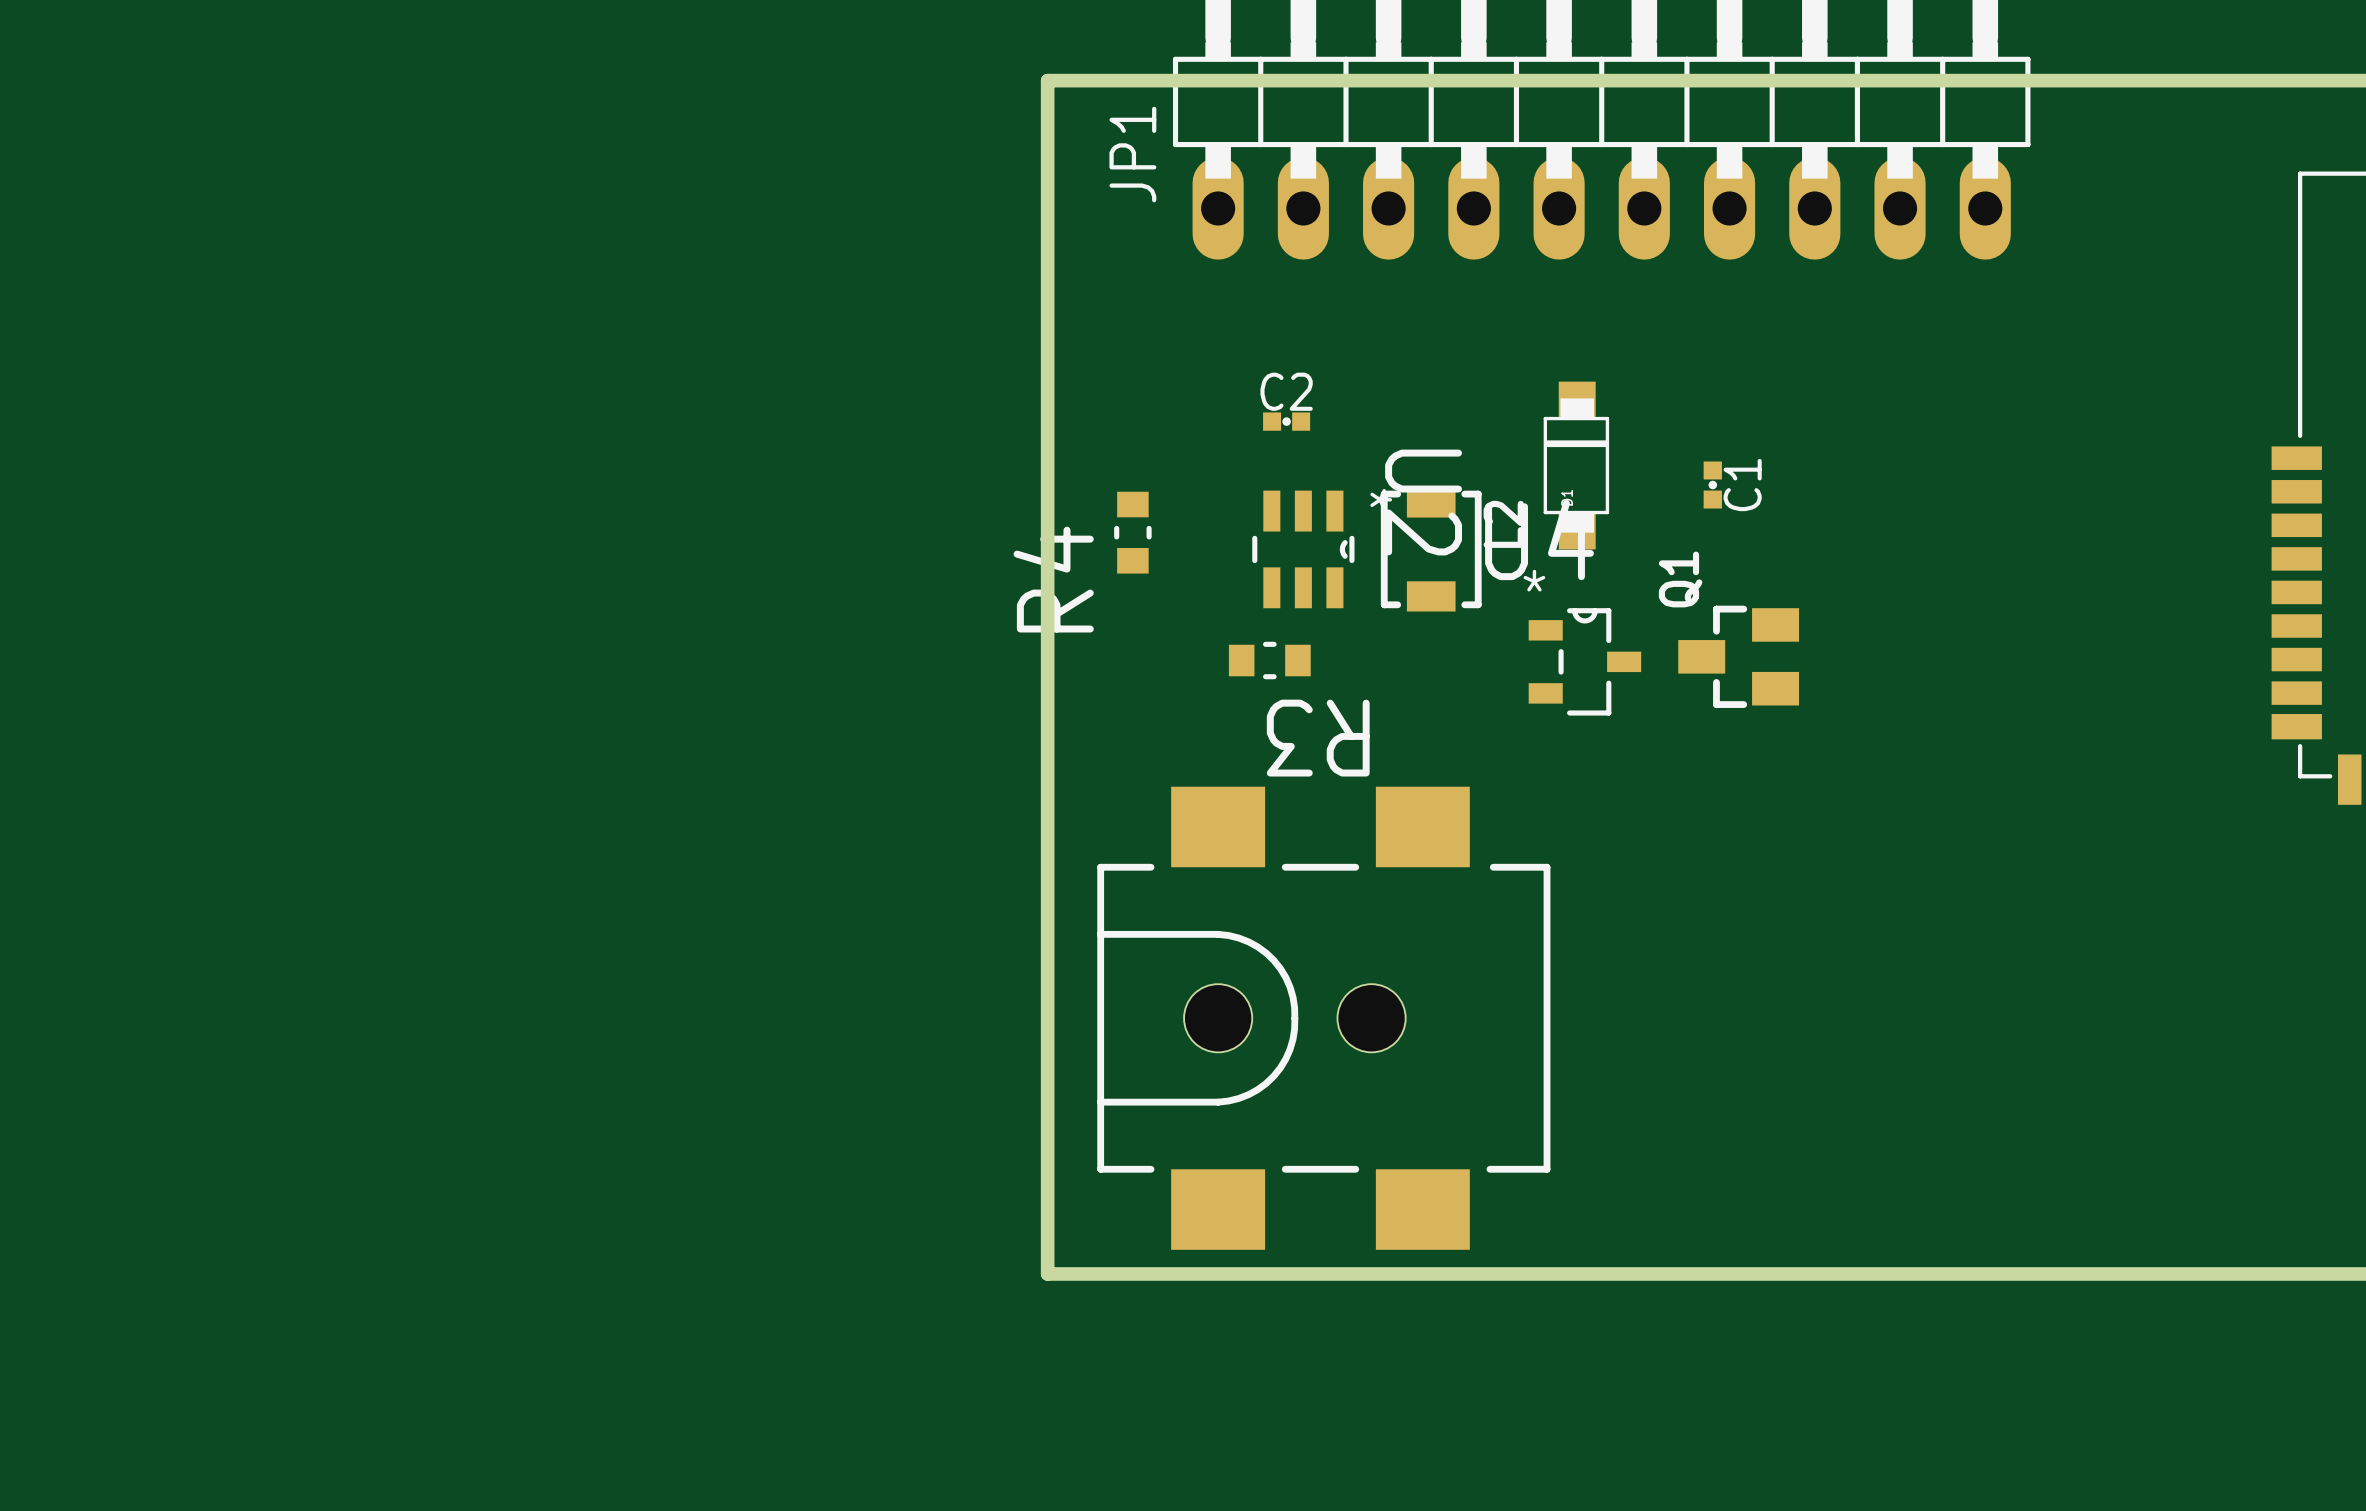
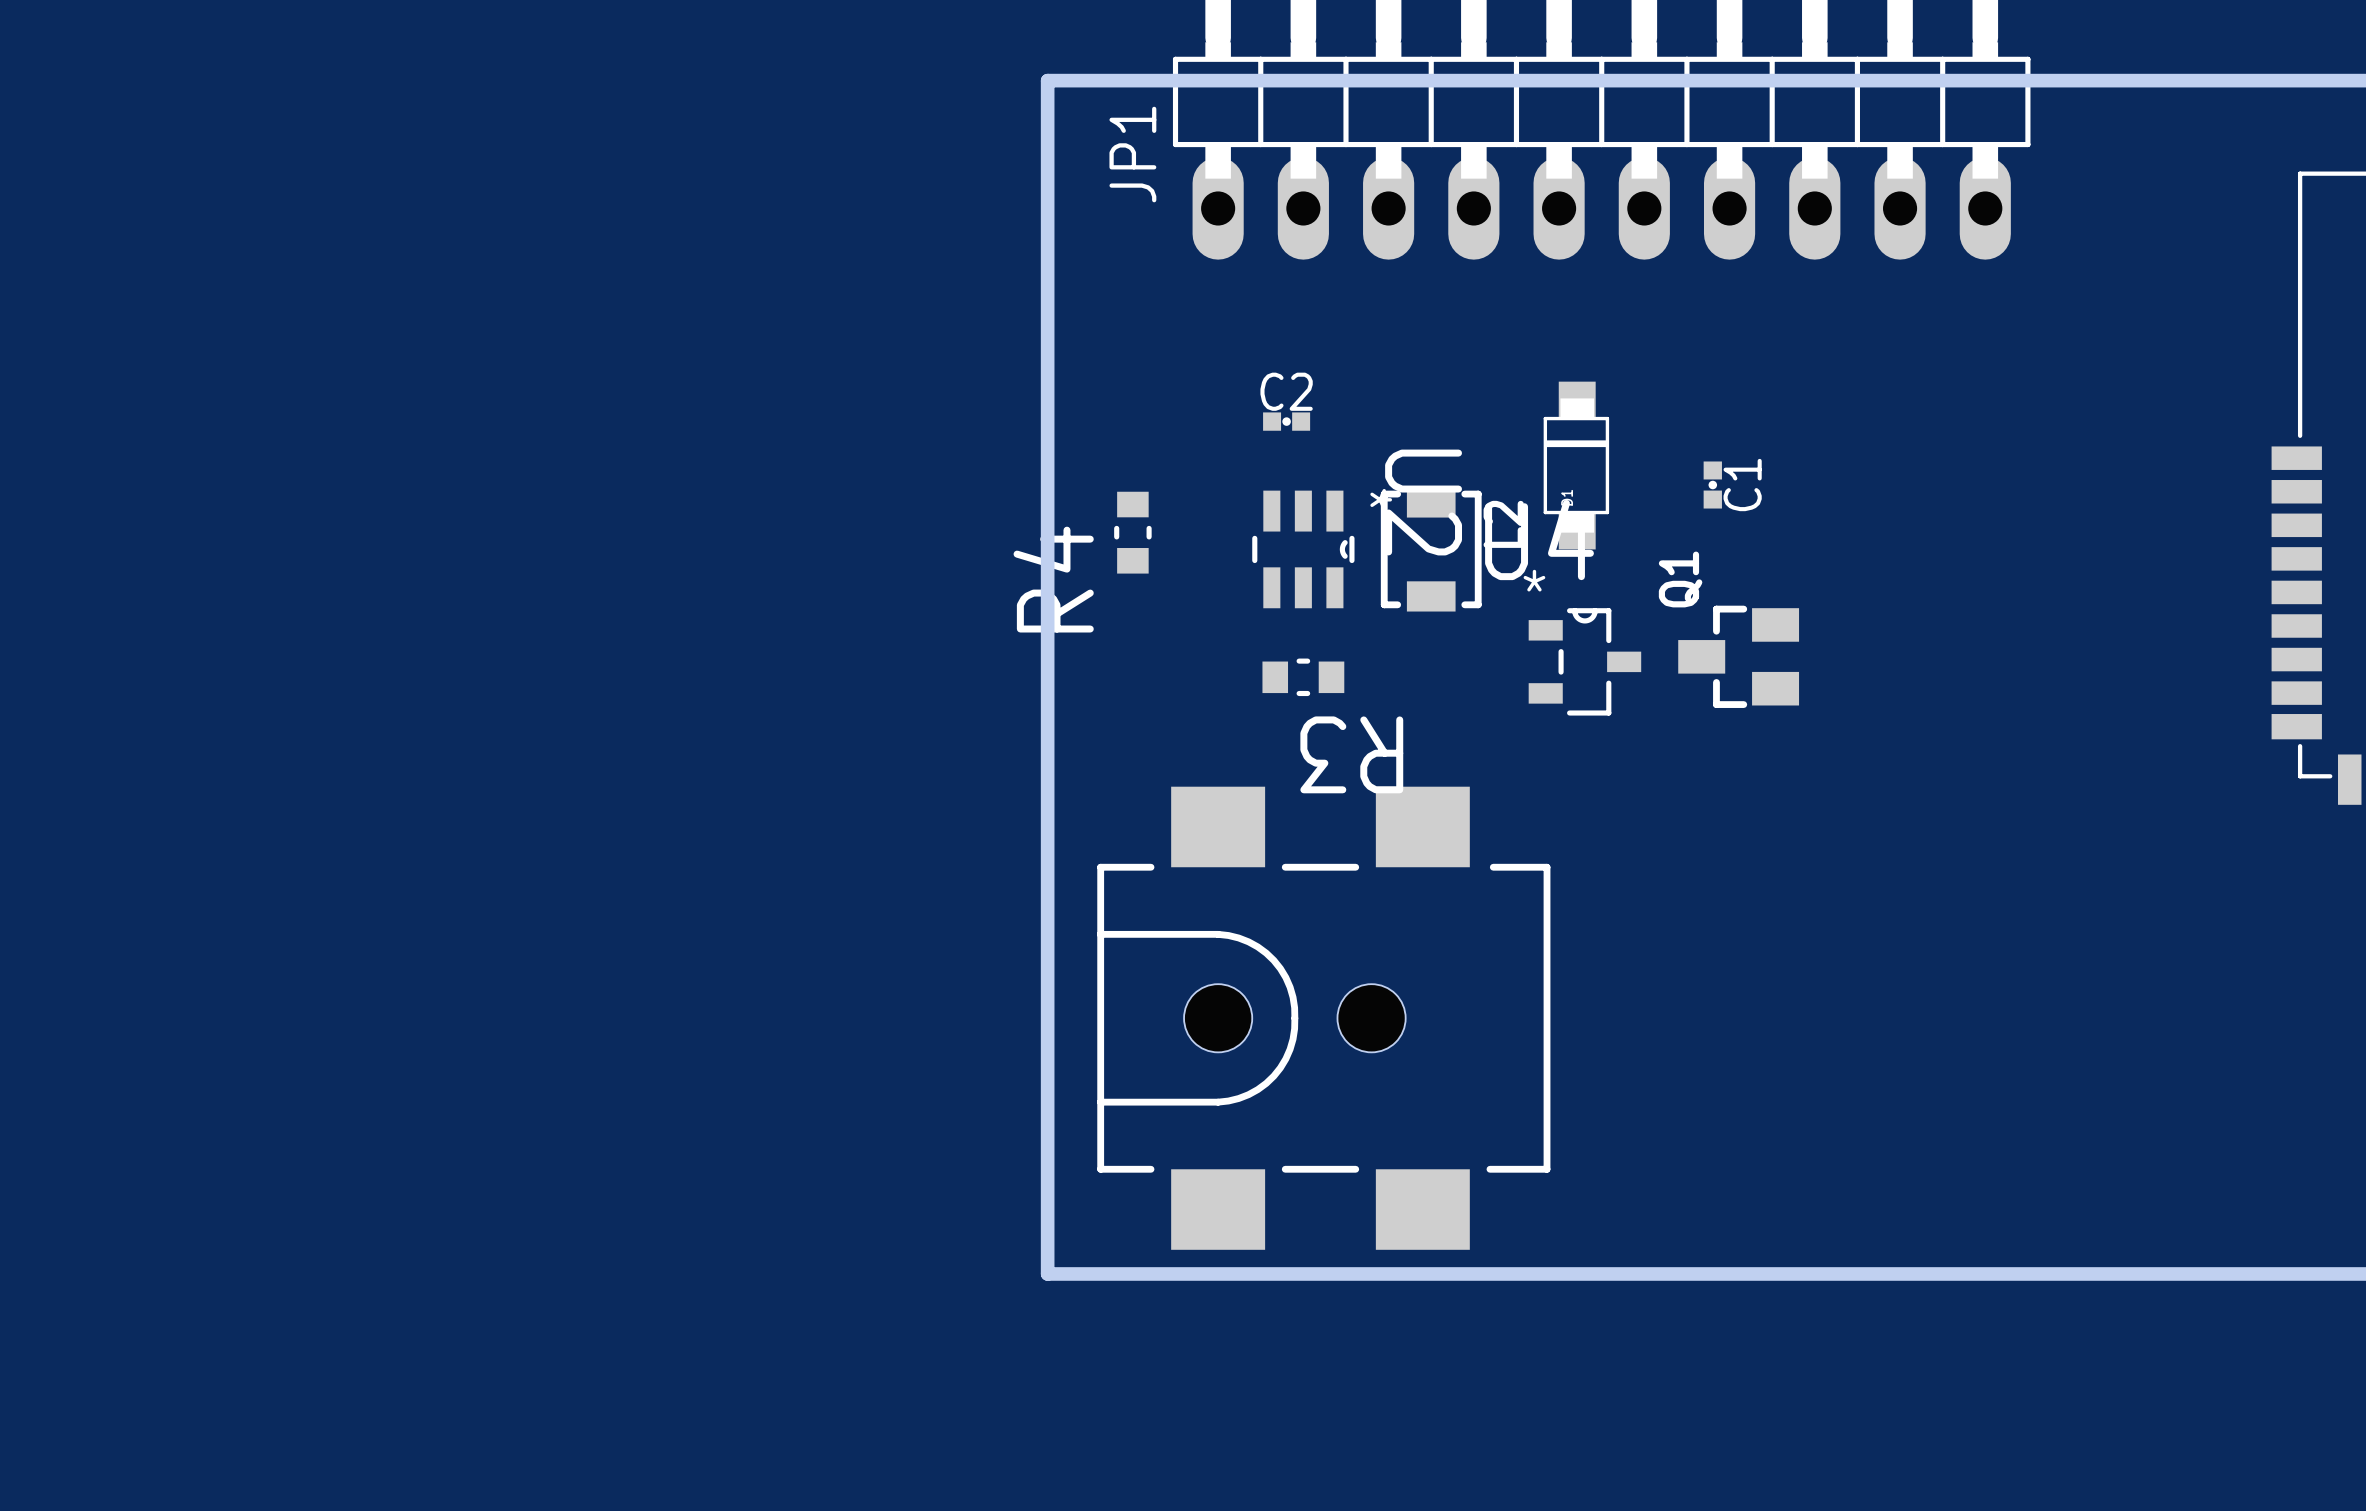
R3 position: (1269, 660) -> (1303, 677)

